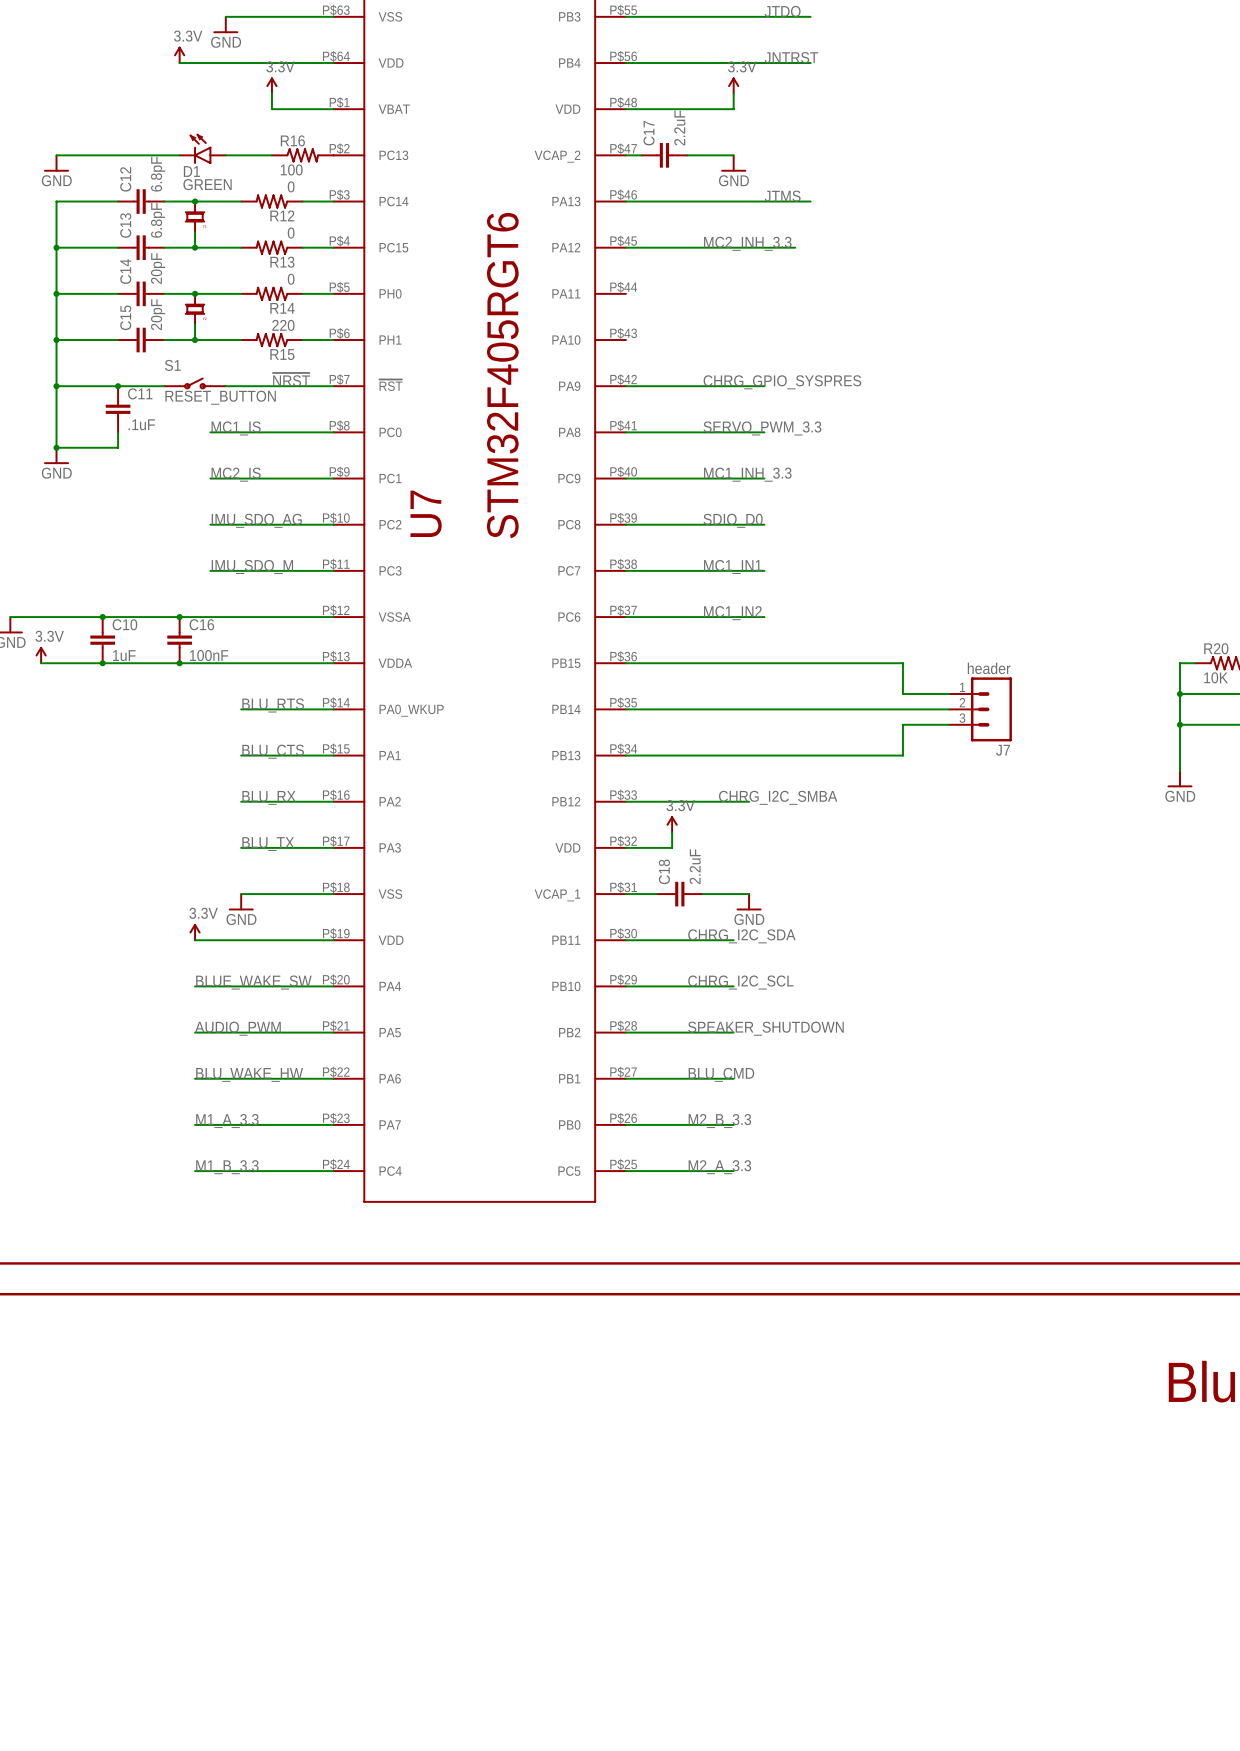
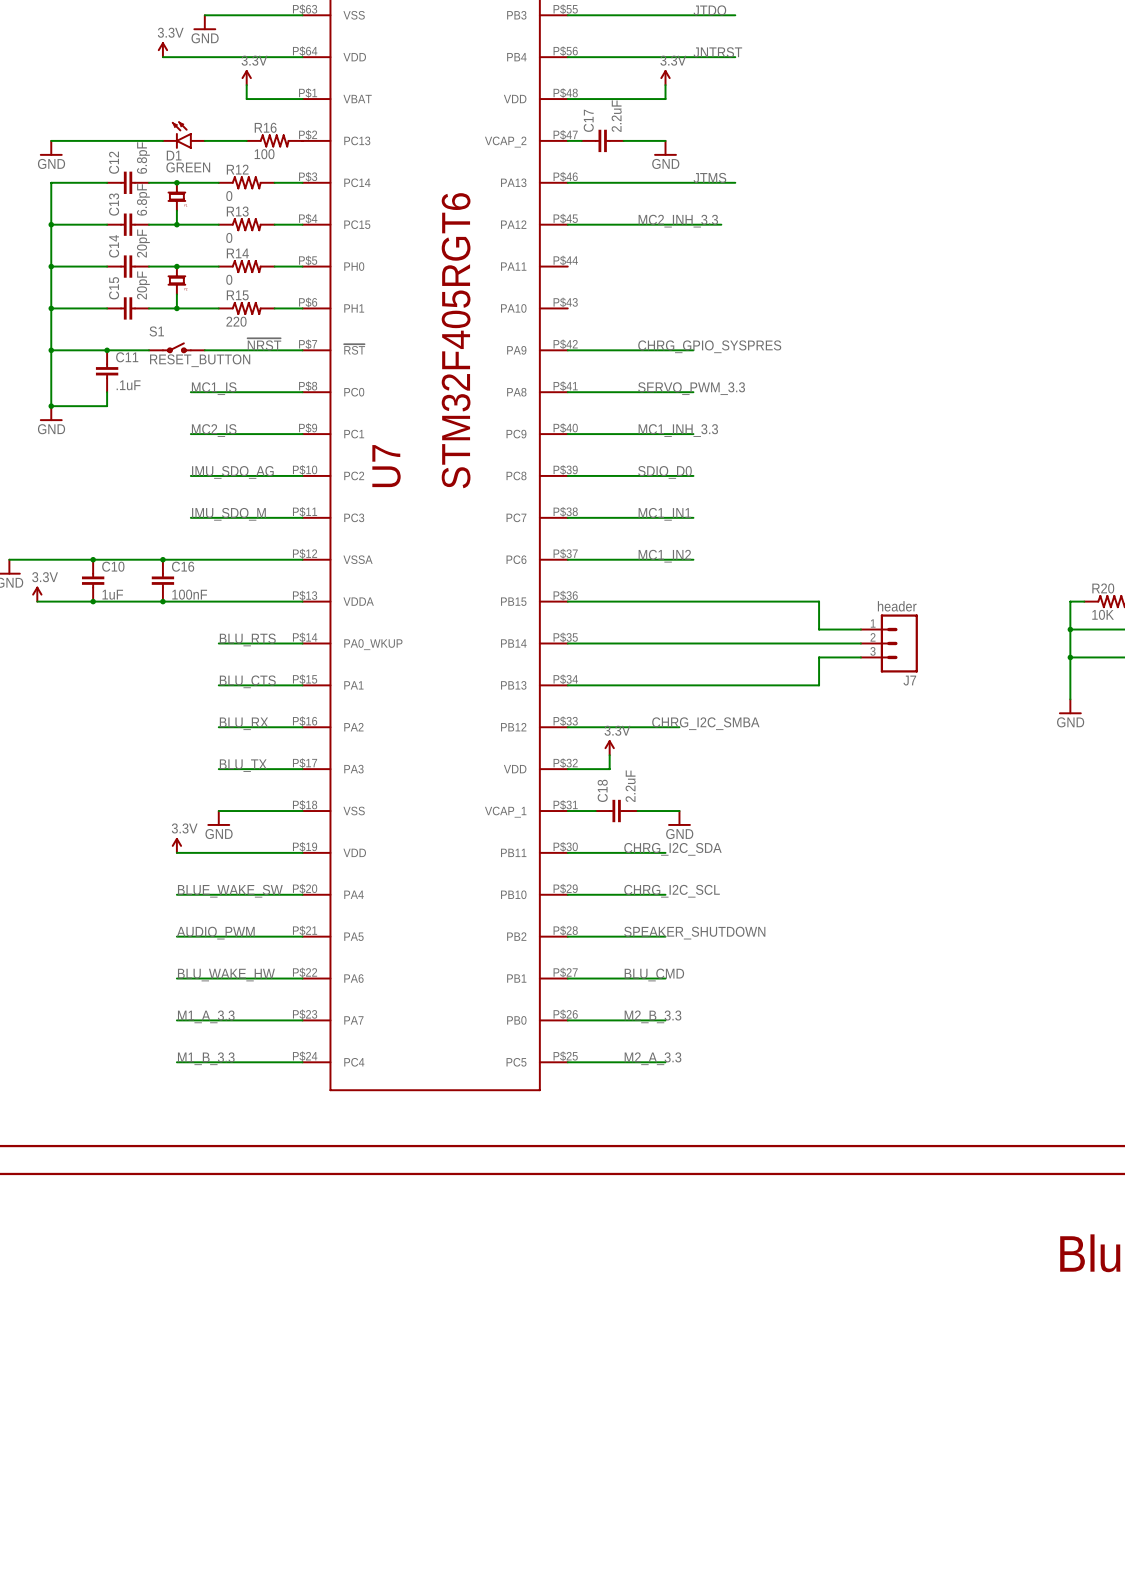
R12 rotation: 0° (271, 201) -> 180° (246, 182)
R13 rotation: 0° (271, 247) -> 180° (246, 224)
R14 rotation: 0° (271, 293) -> 180° (246, 266)
R15 rotation: 0° (271, 340) -> 180° (246, 308)

